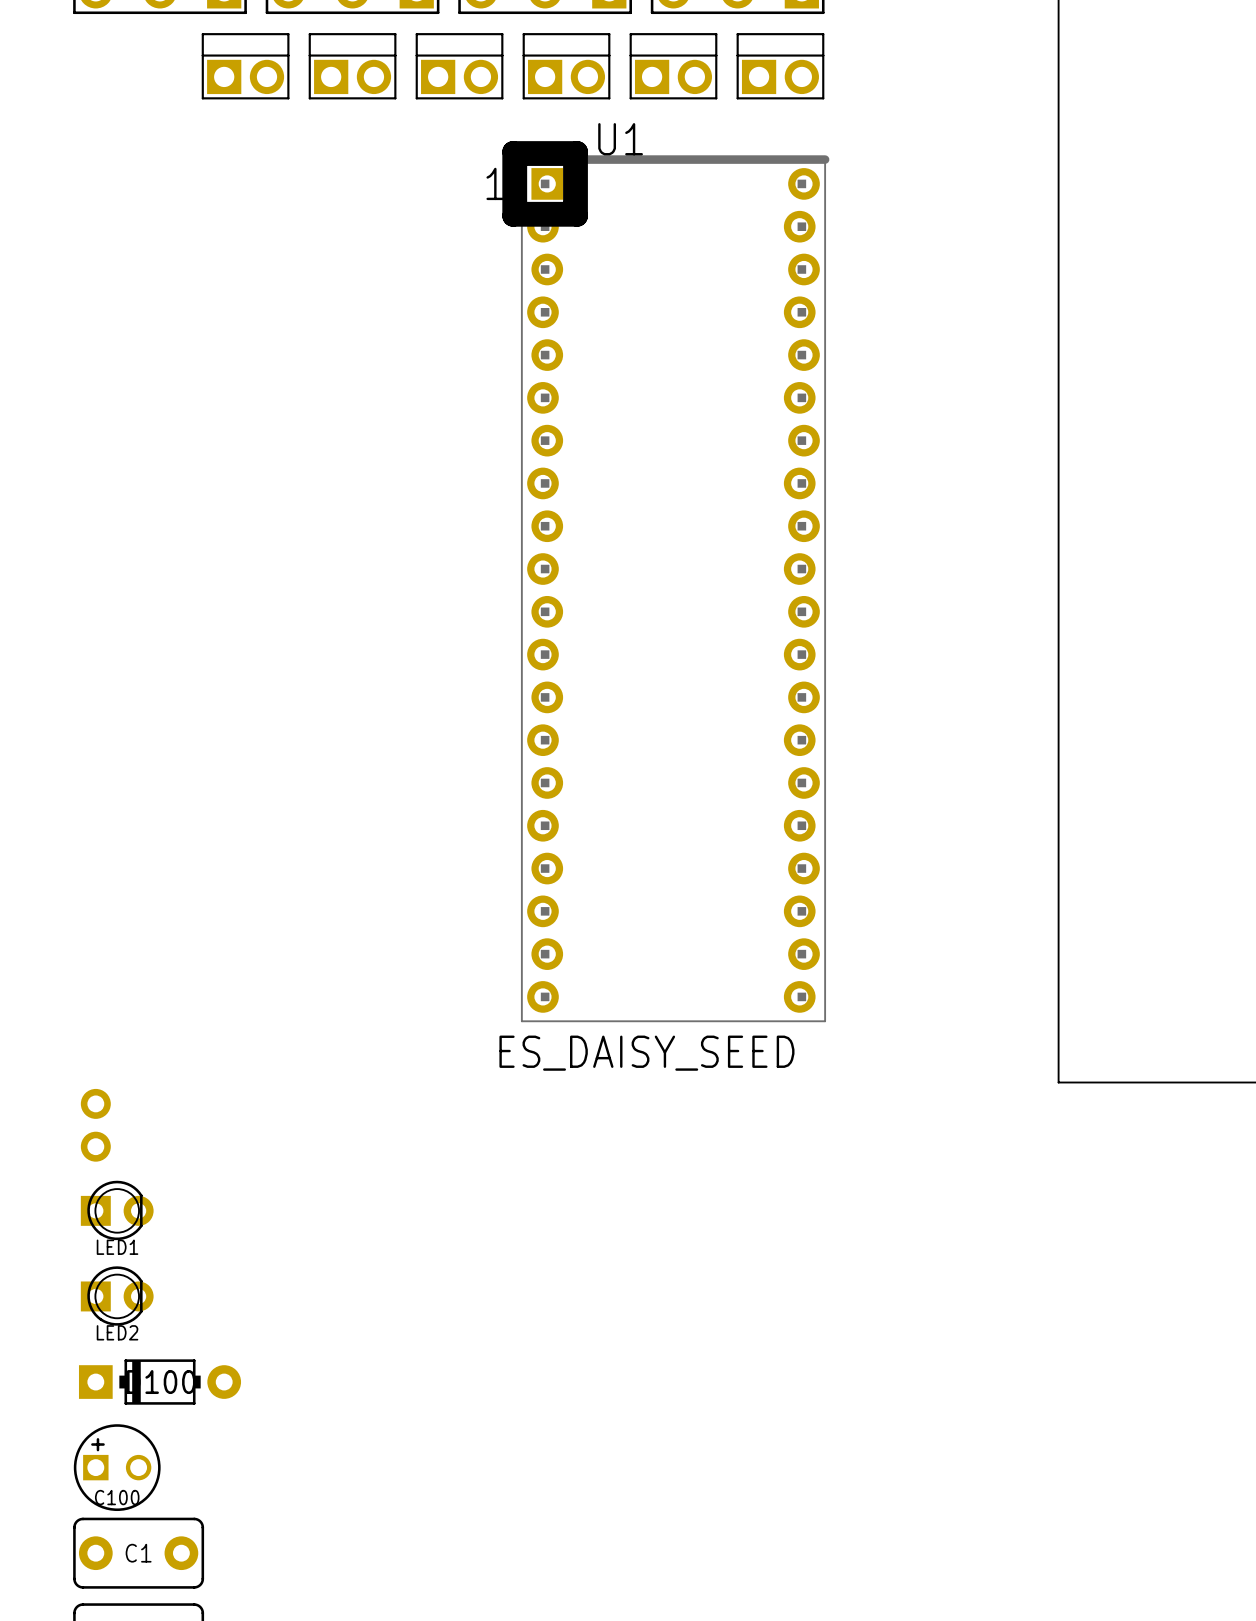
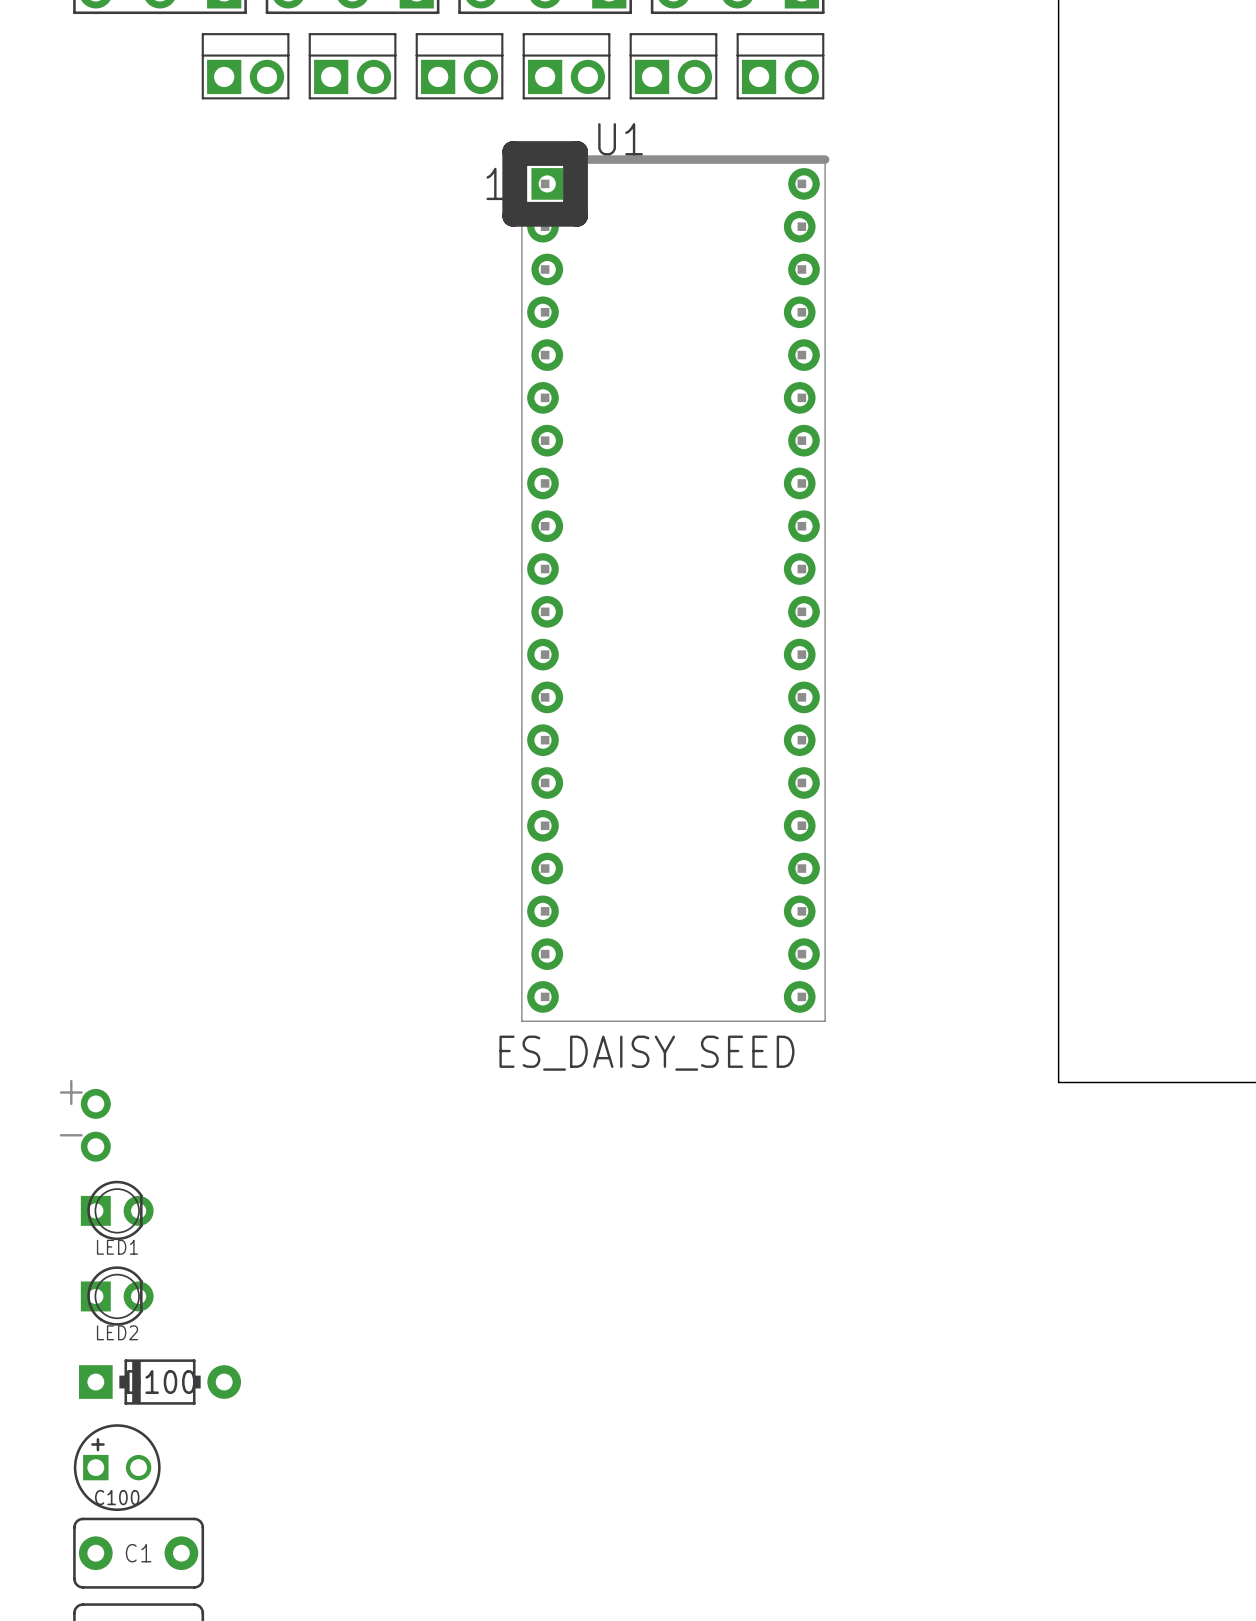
part text: none -> + (71, 1092)
part text: none -> - (71, 1135)

